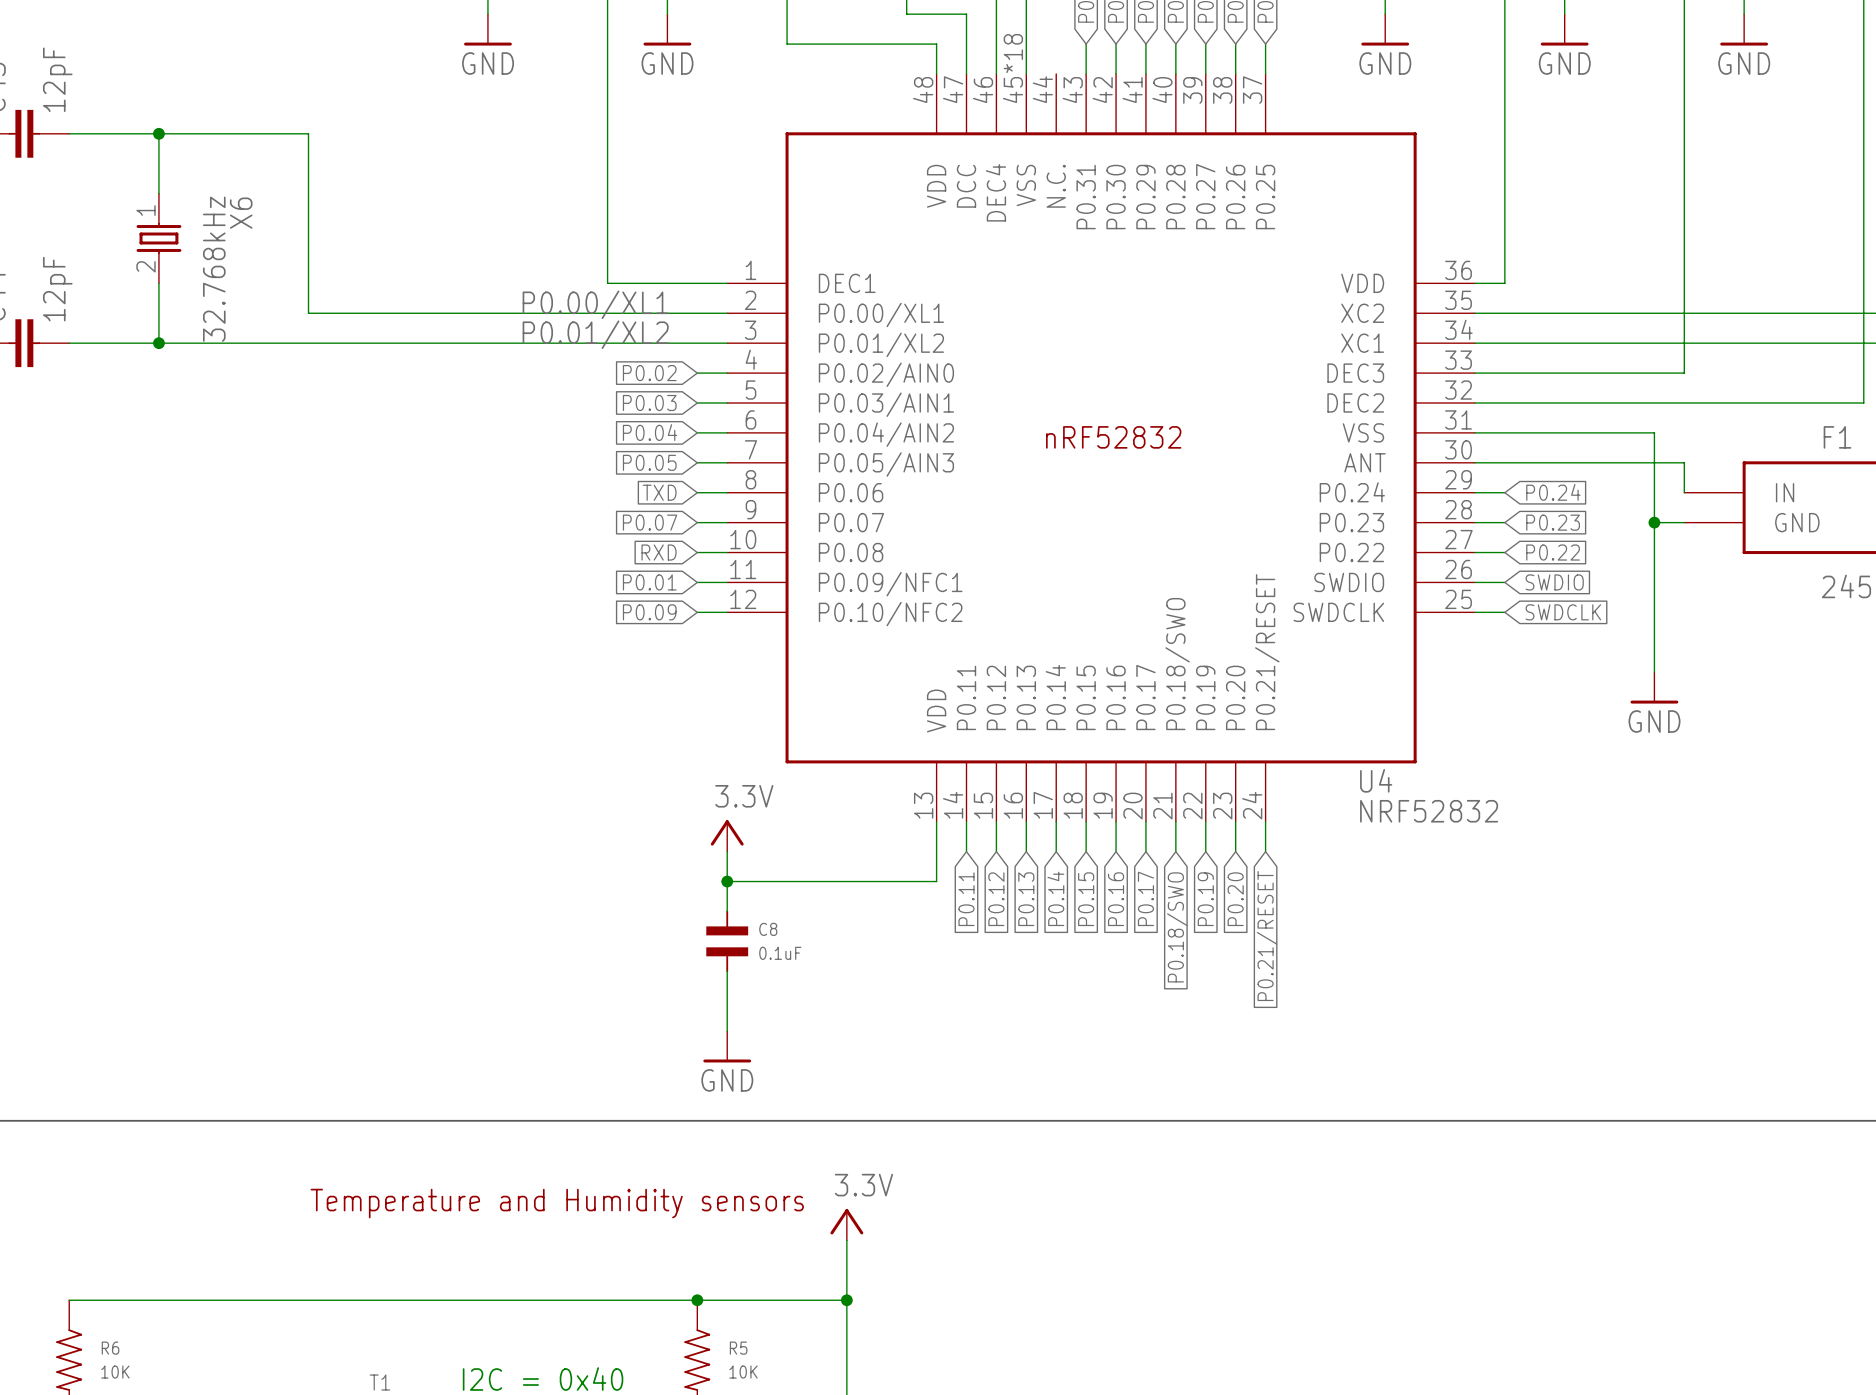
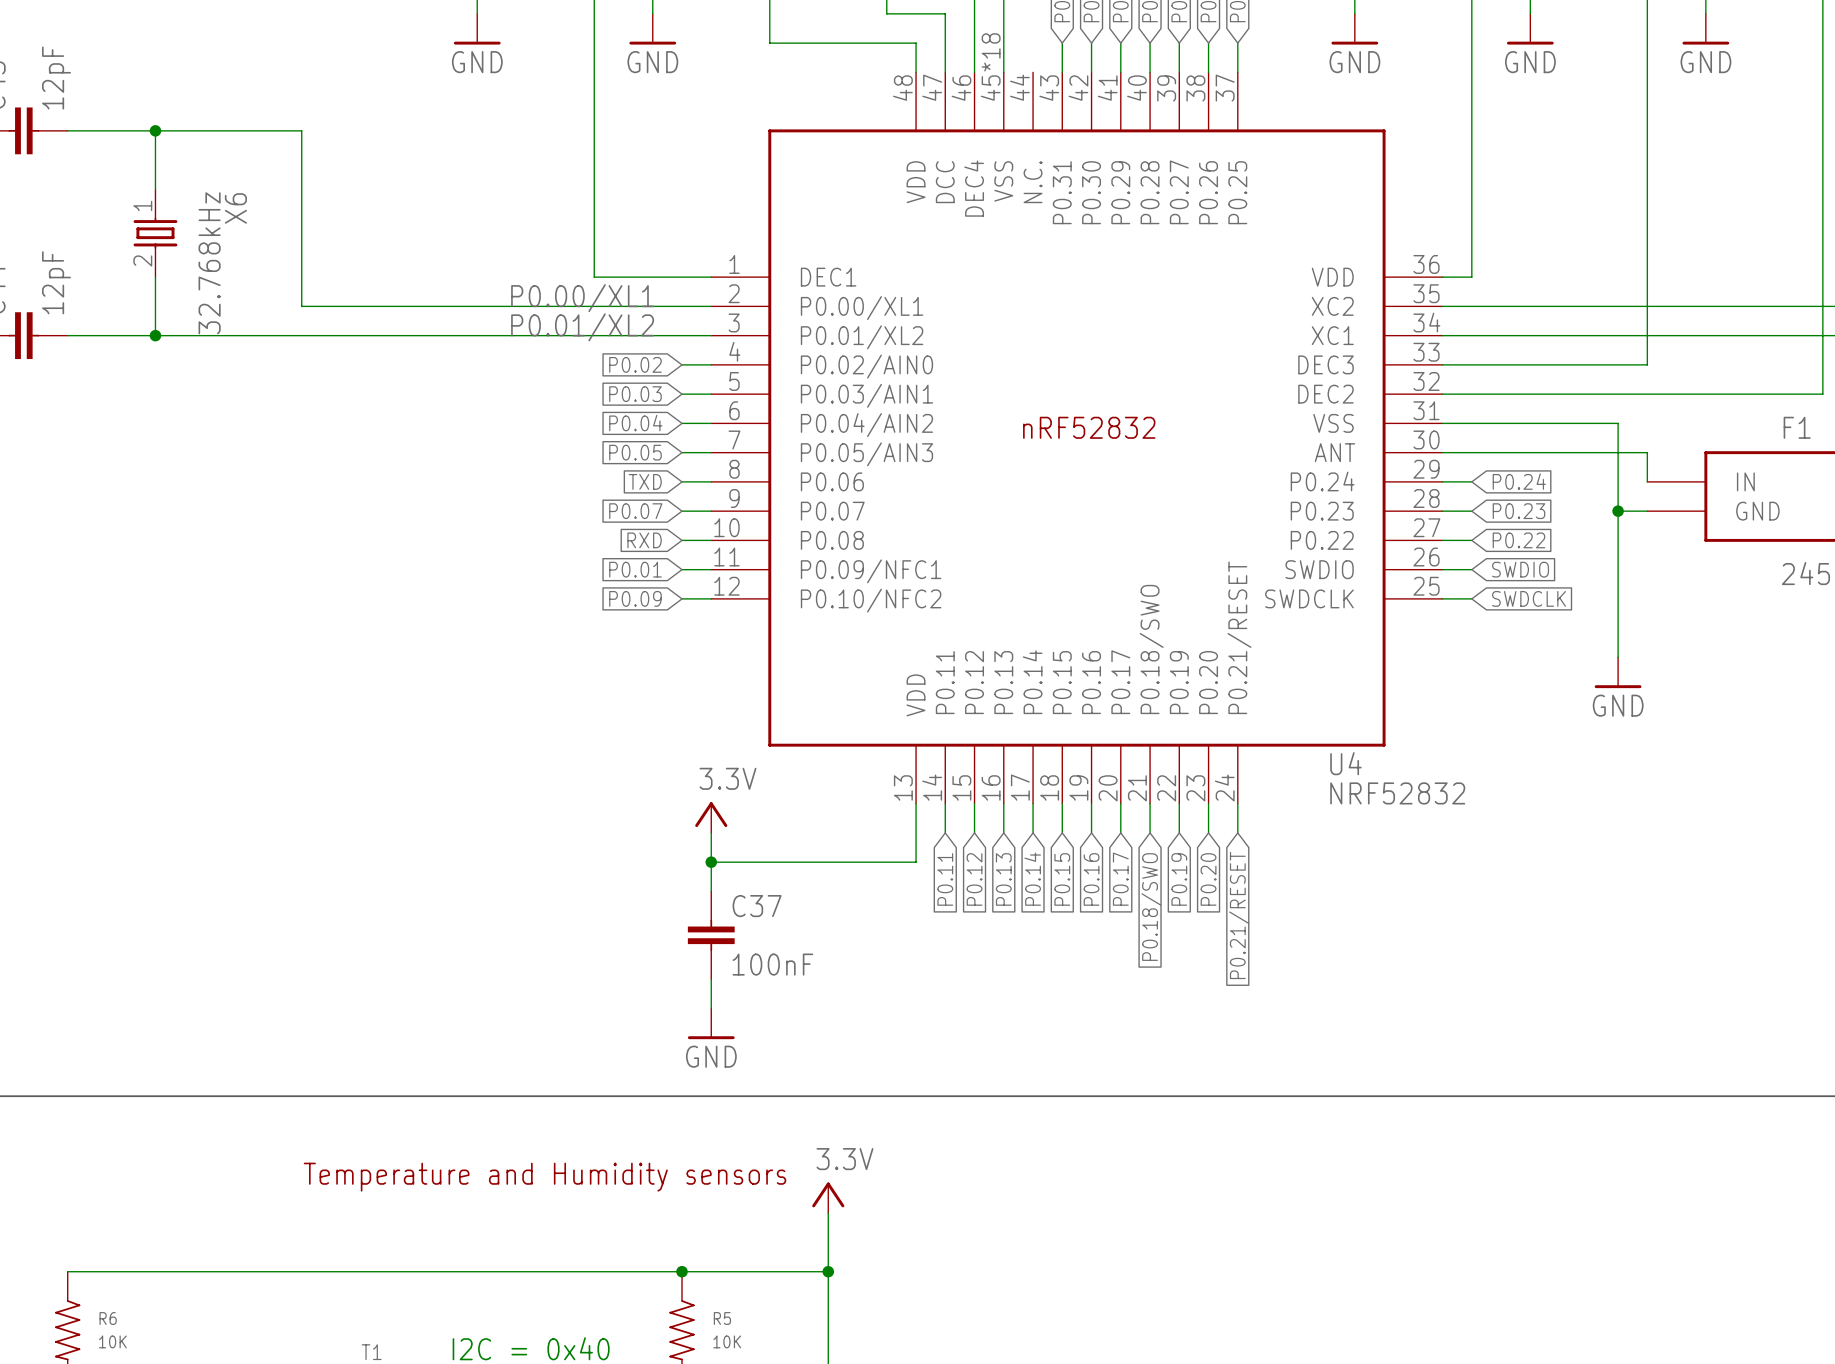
C8: 0.1uF (727, 941) -> none
C37: none -> 100nF (711, 935)

